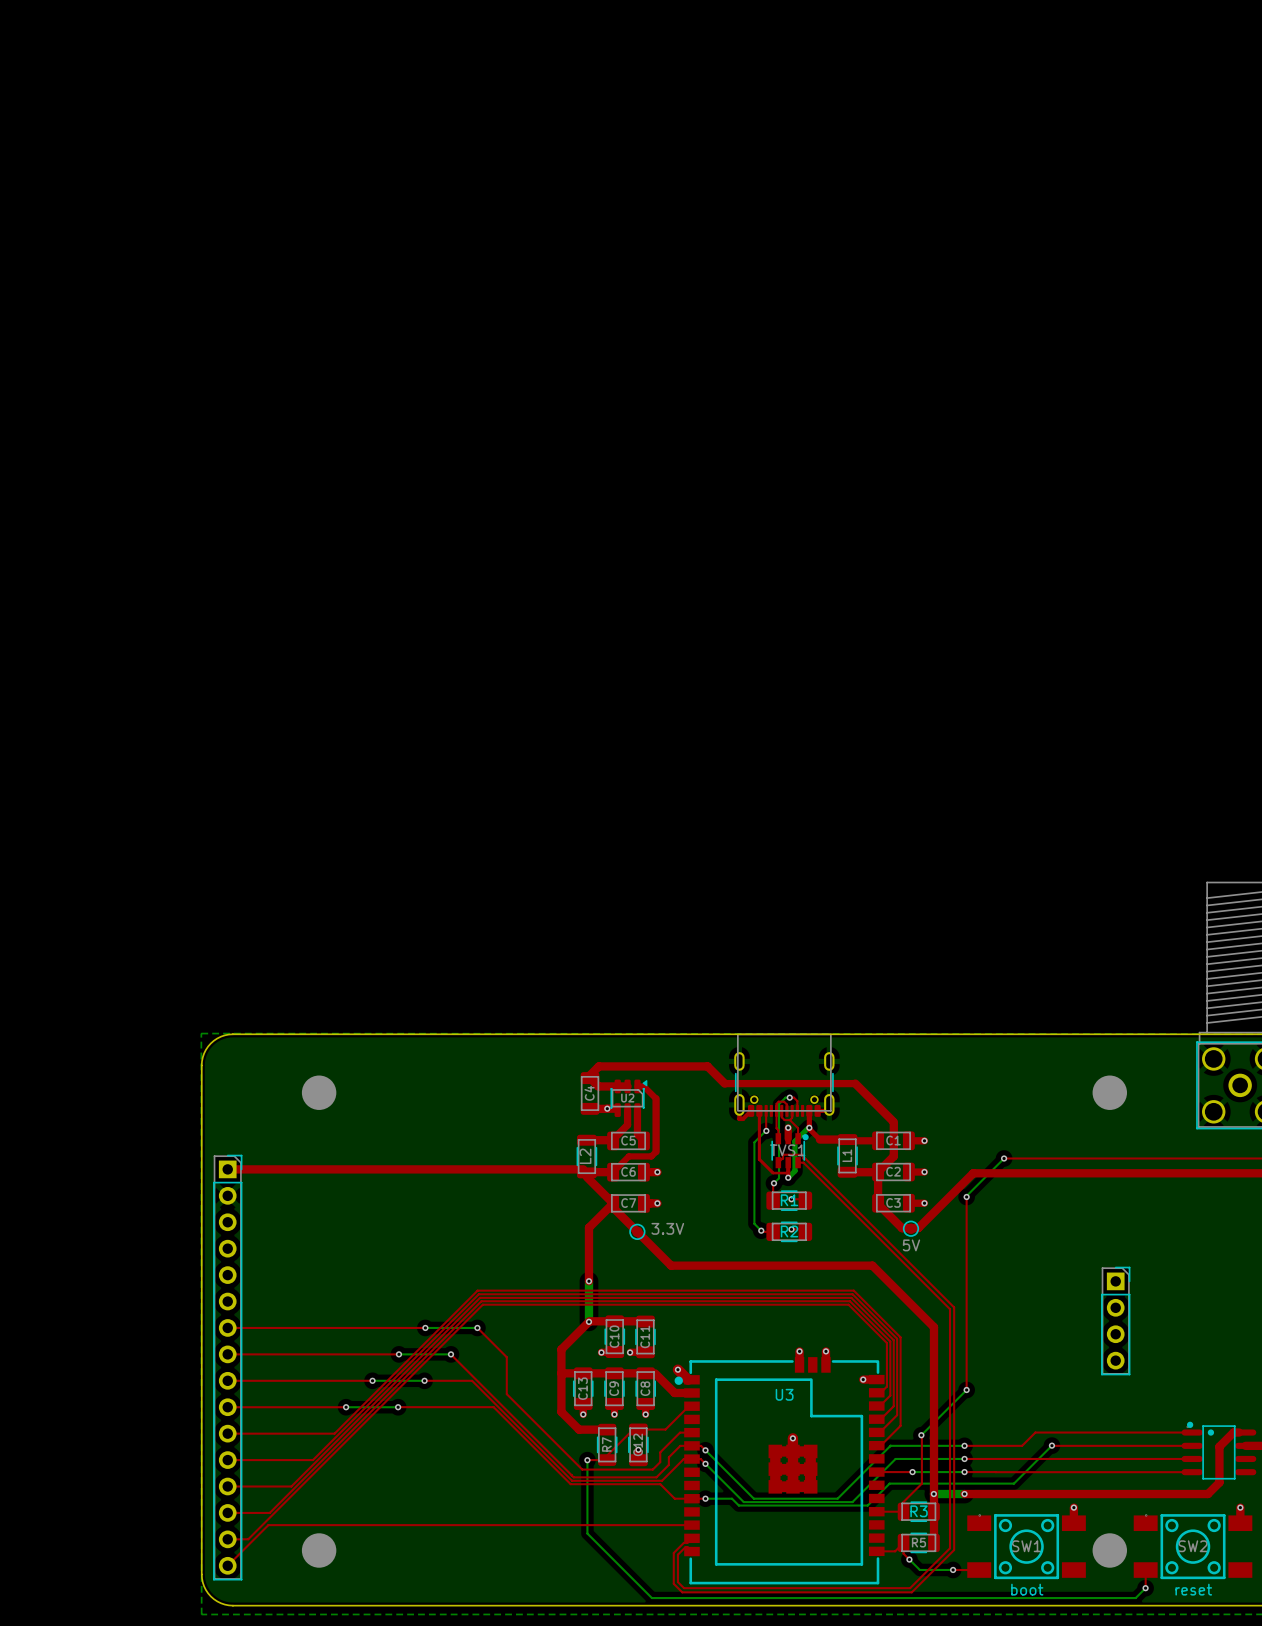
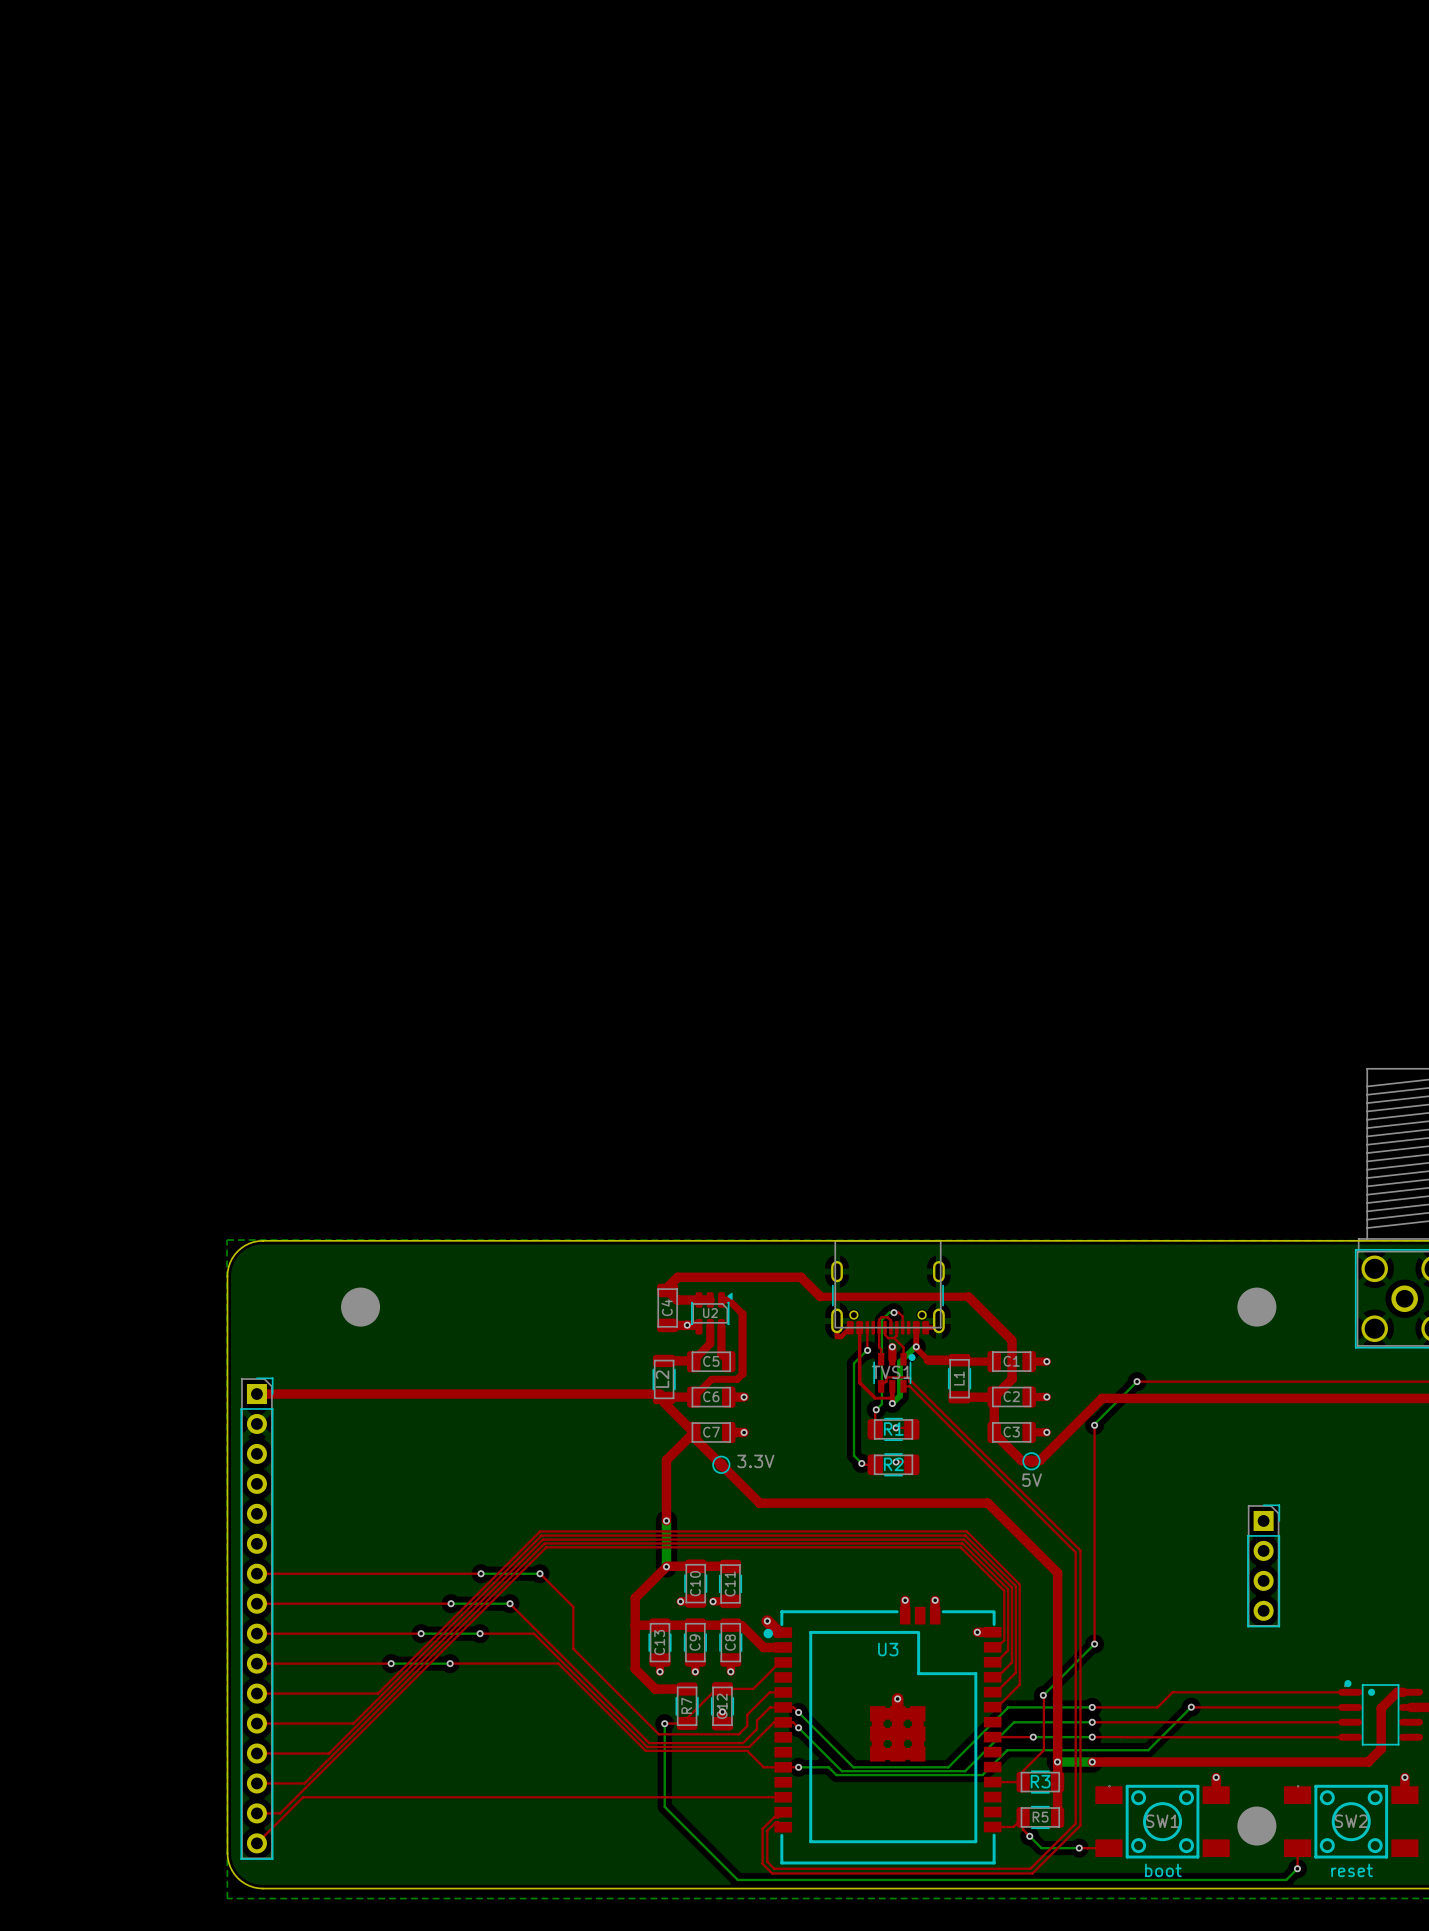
drawing: [301, 1533, 337, 1568] -> none

